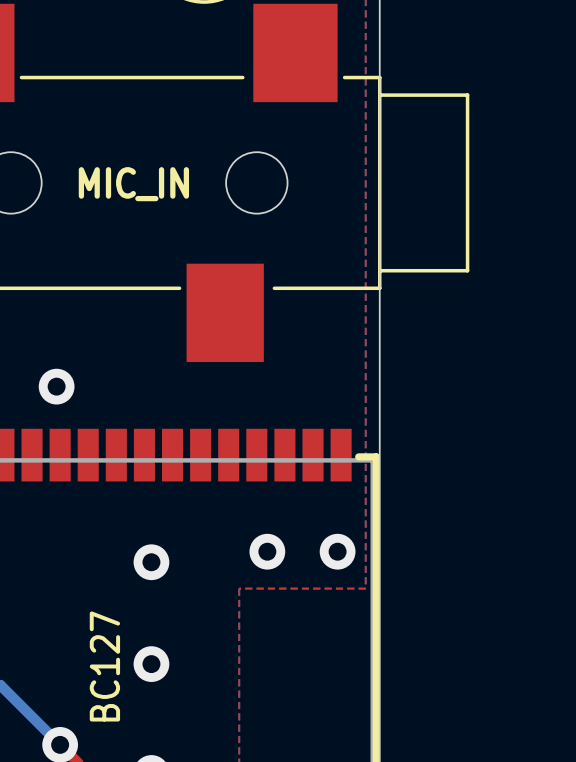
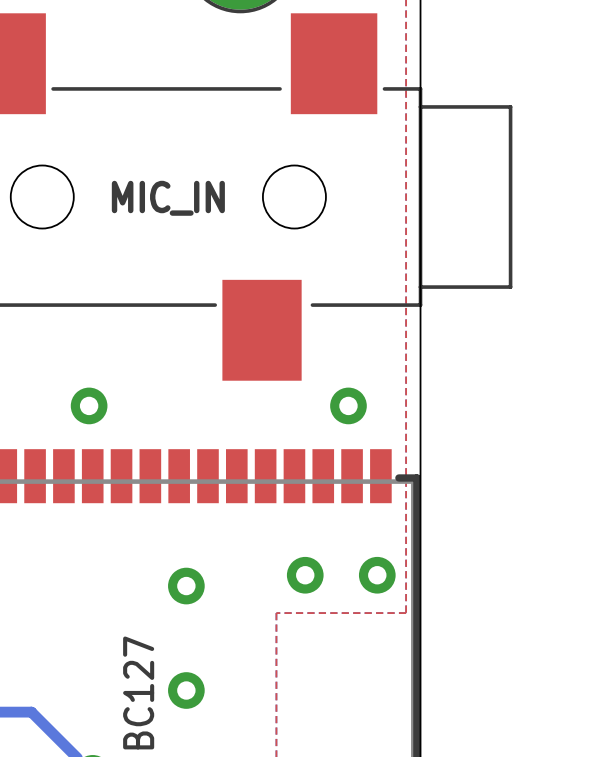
via: none -> (348, 405)

